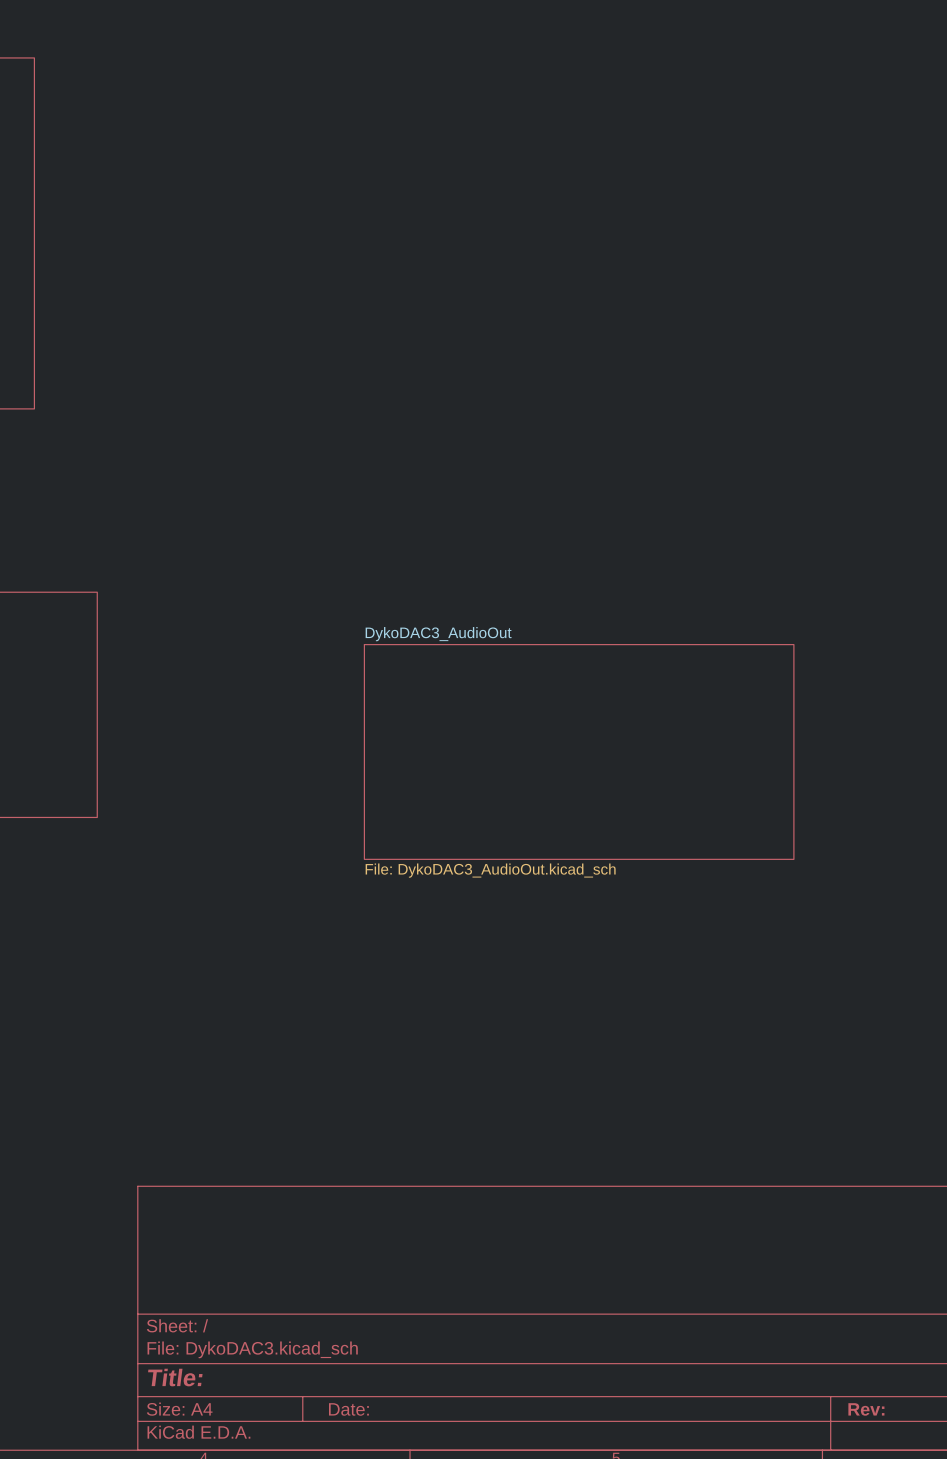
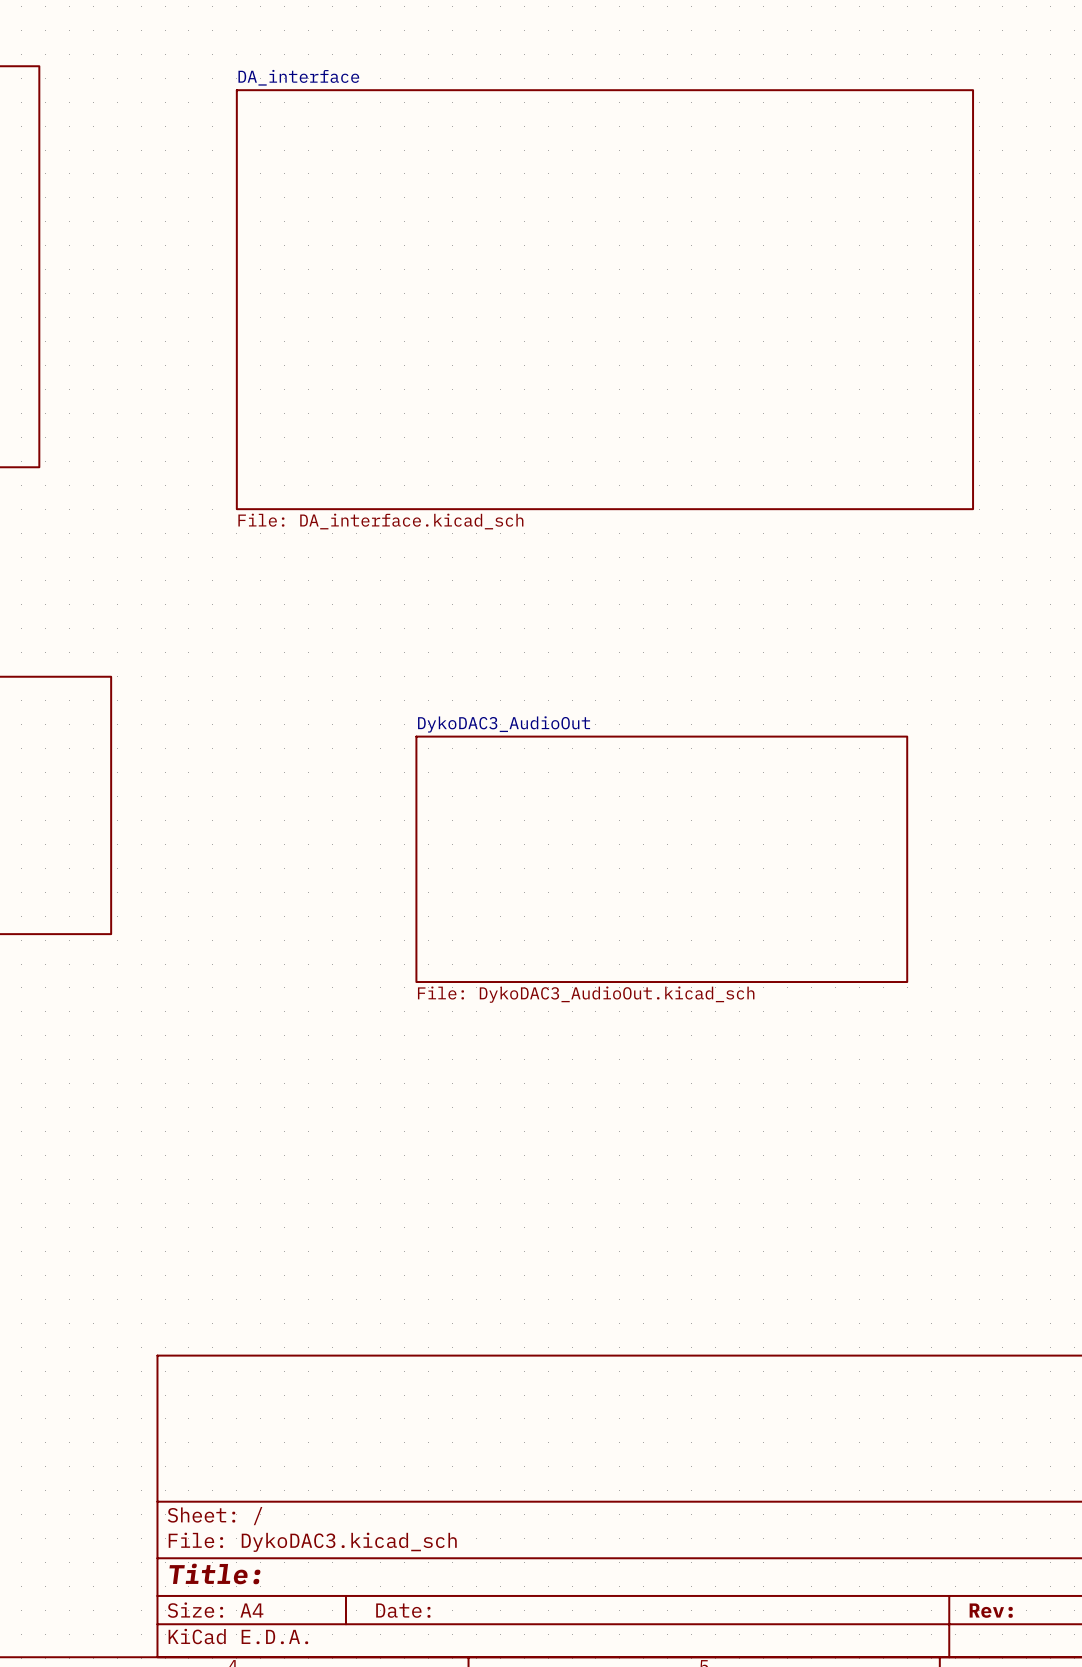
sheet DA_interface: none -> File: DA_interface.kicad_sch (604, 299)

